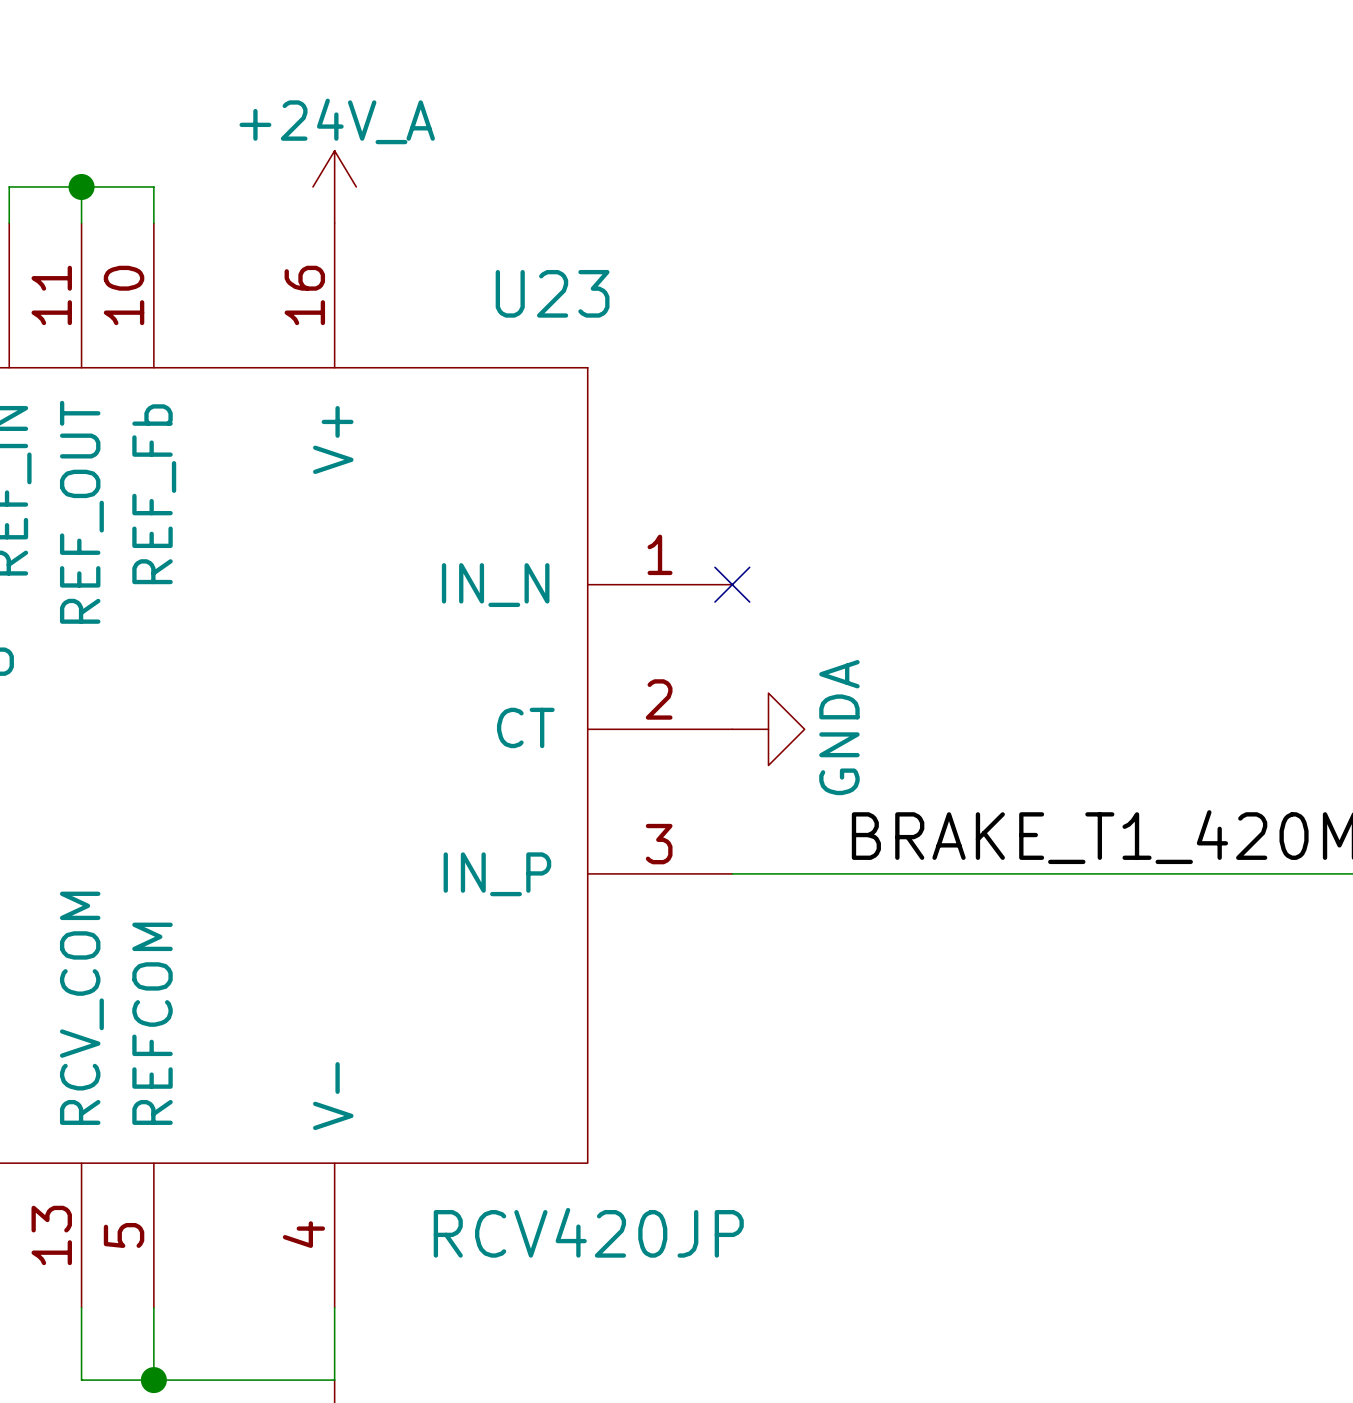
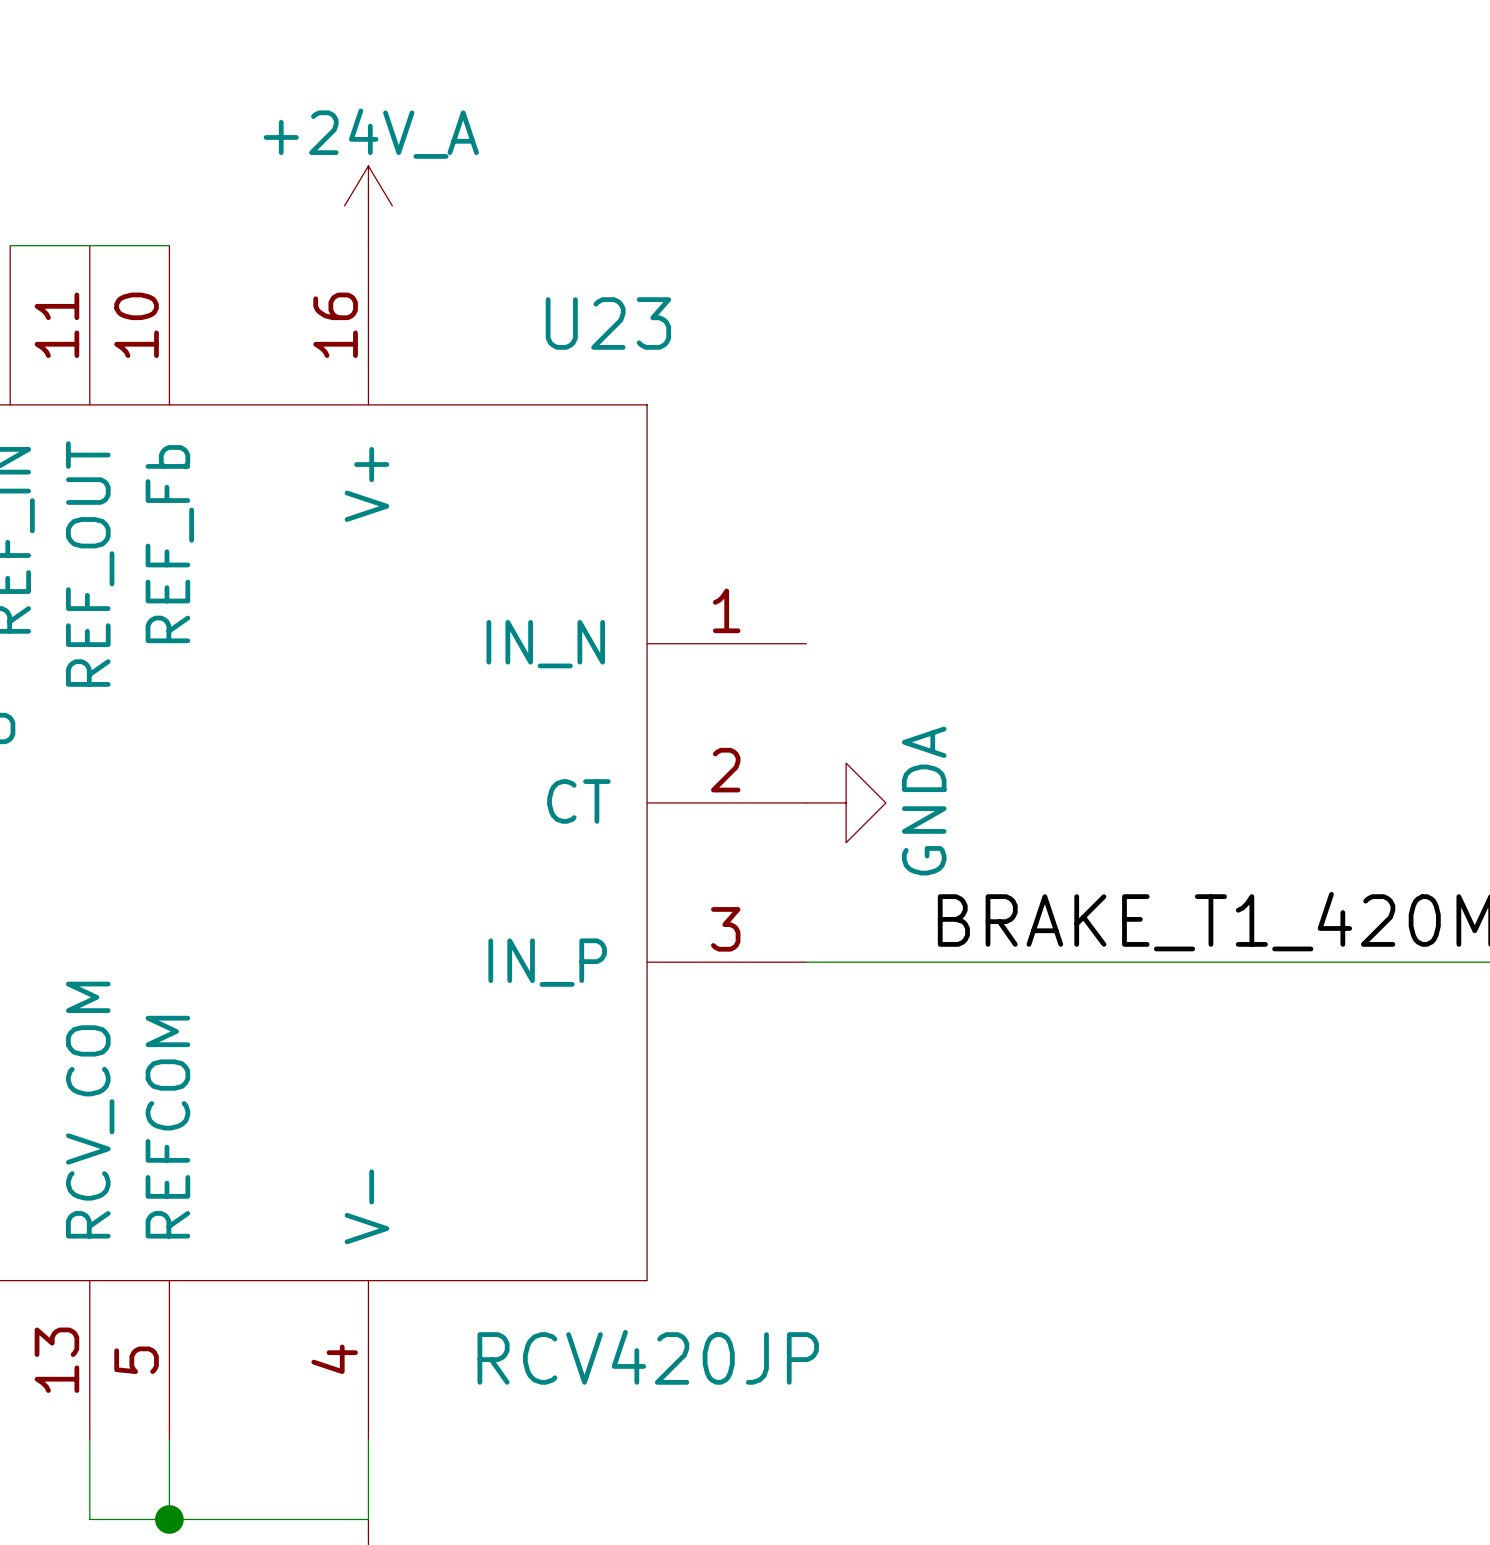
wire: (81, 186) (81, 223) -> none
junction: (81, 186) -> none
wire: (9, 223) (9, 186) (153, 186) (153, 223) -> (10, 245) (169, 245)
no-connect mark: (732, 584) -> none

